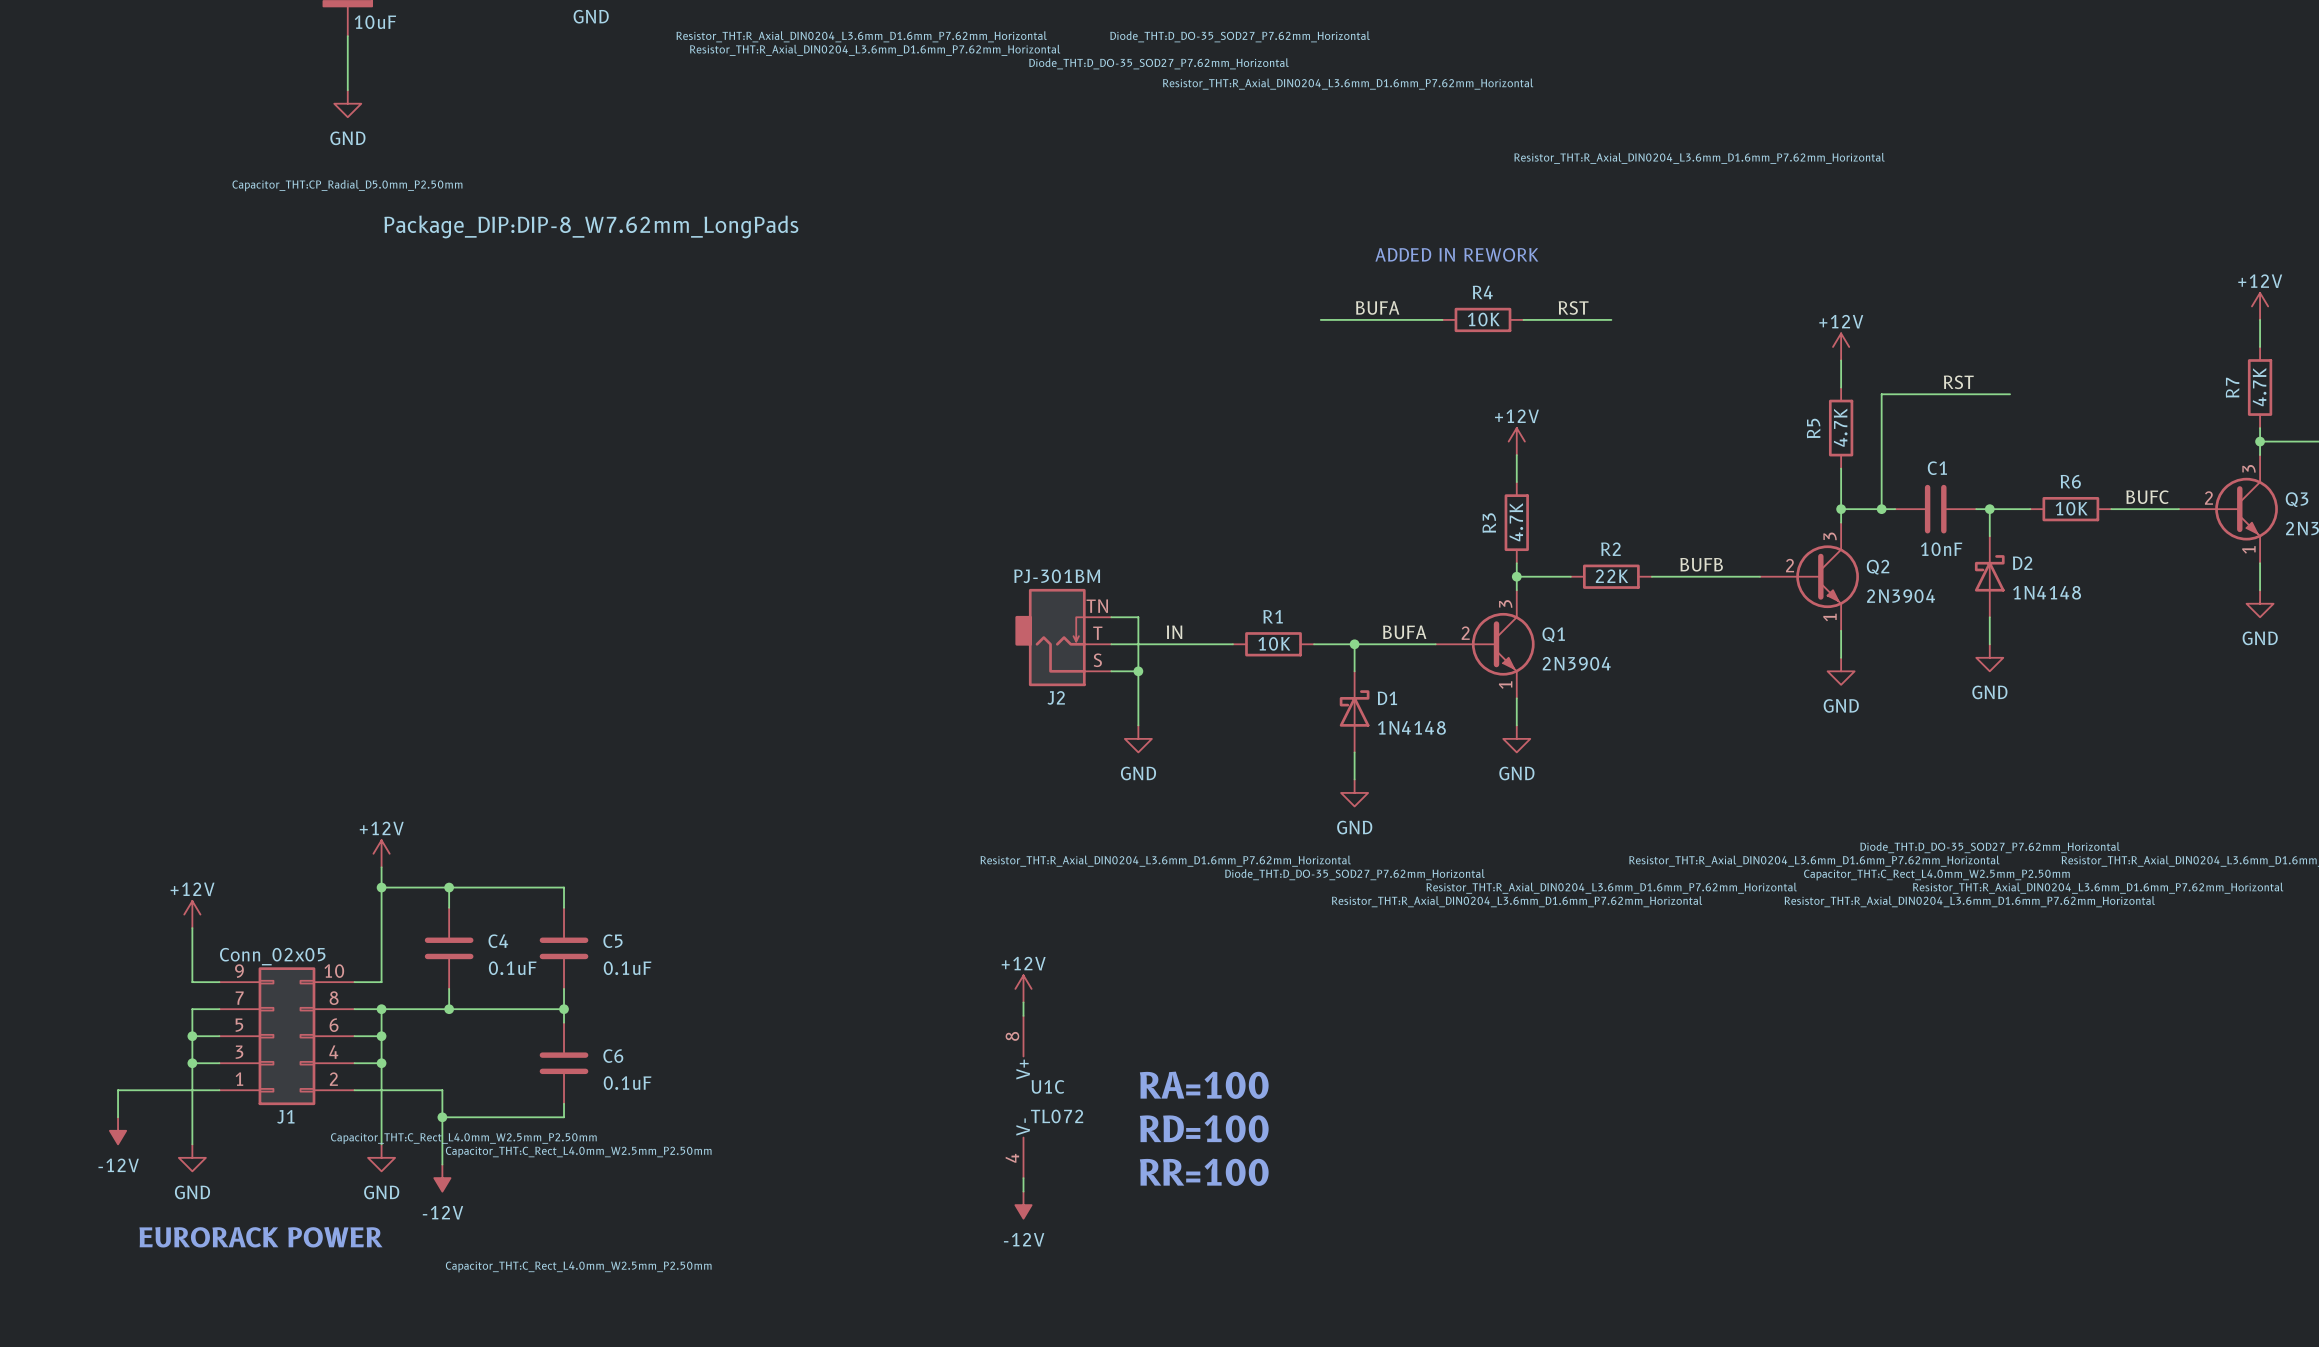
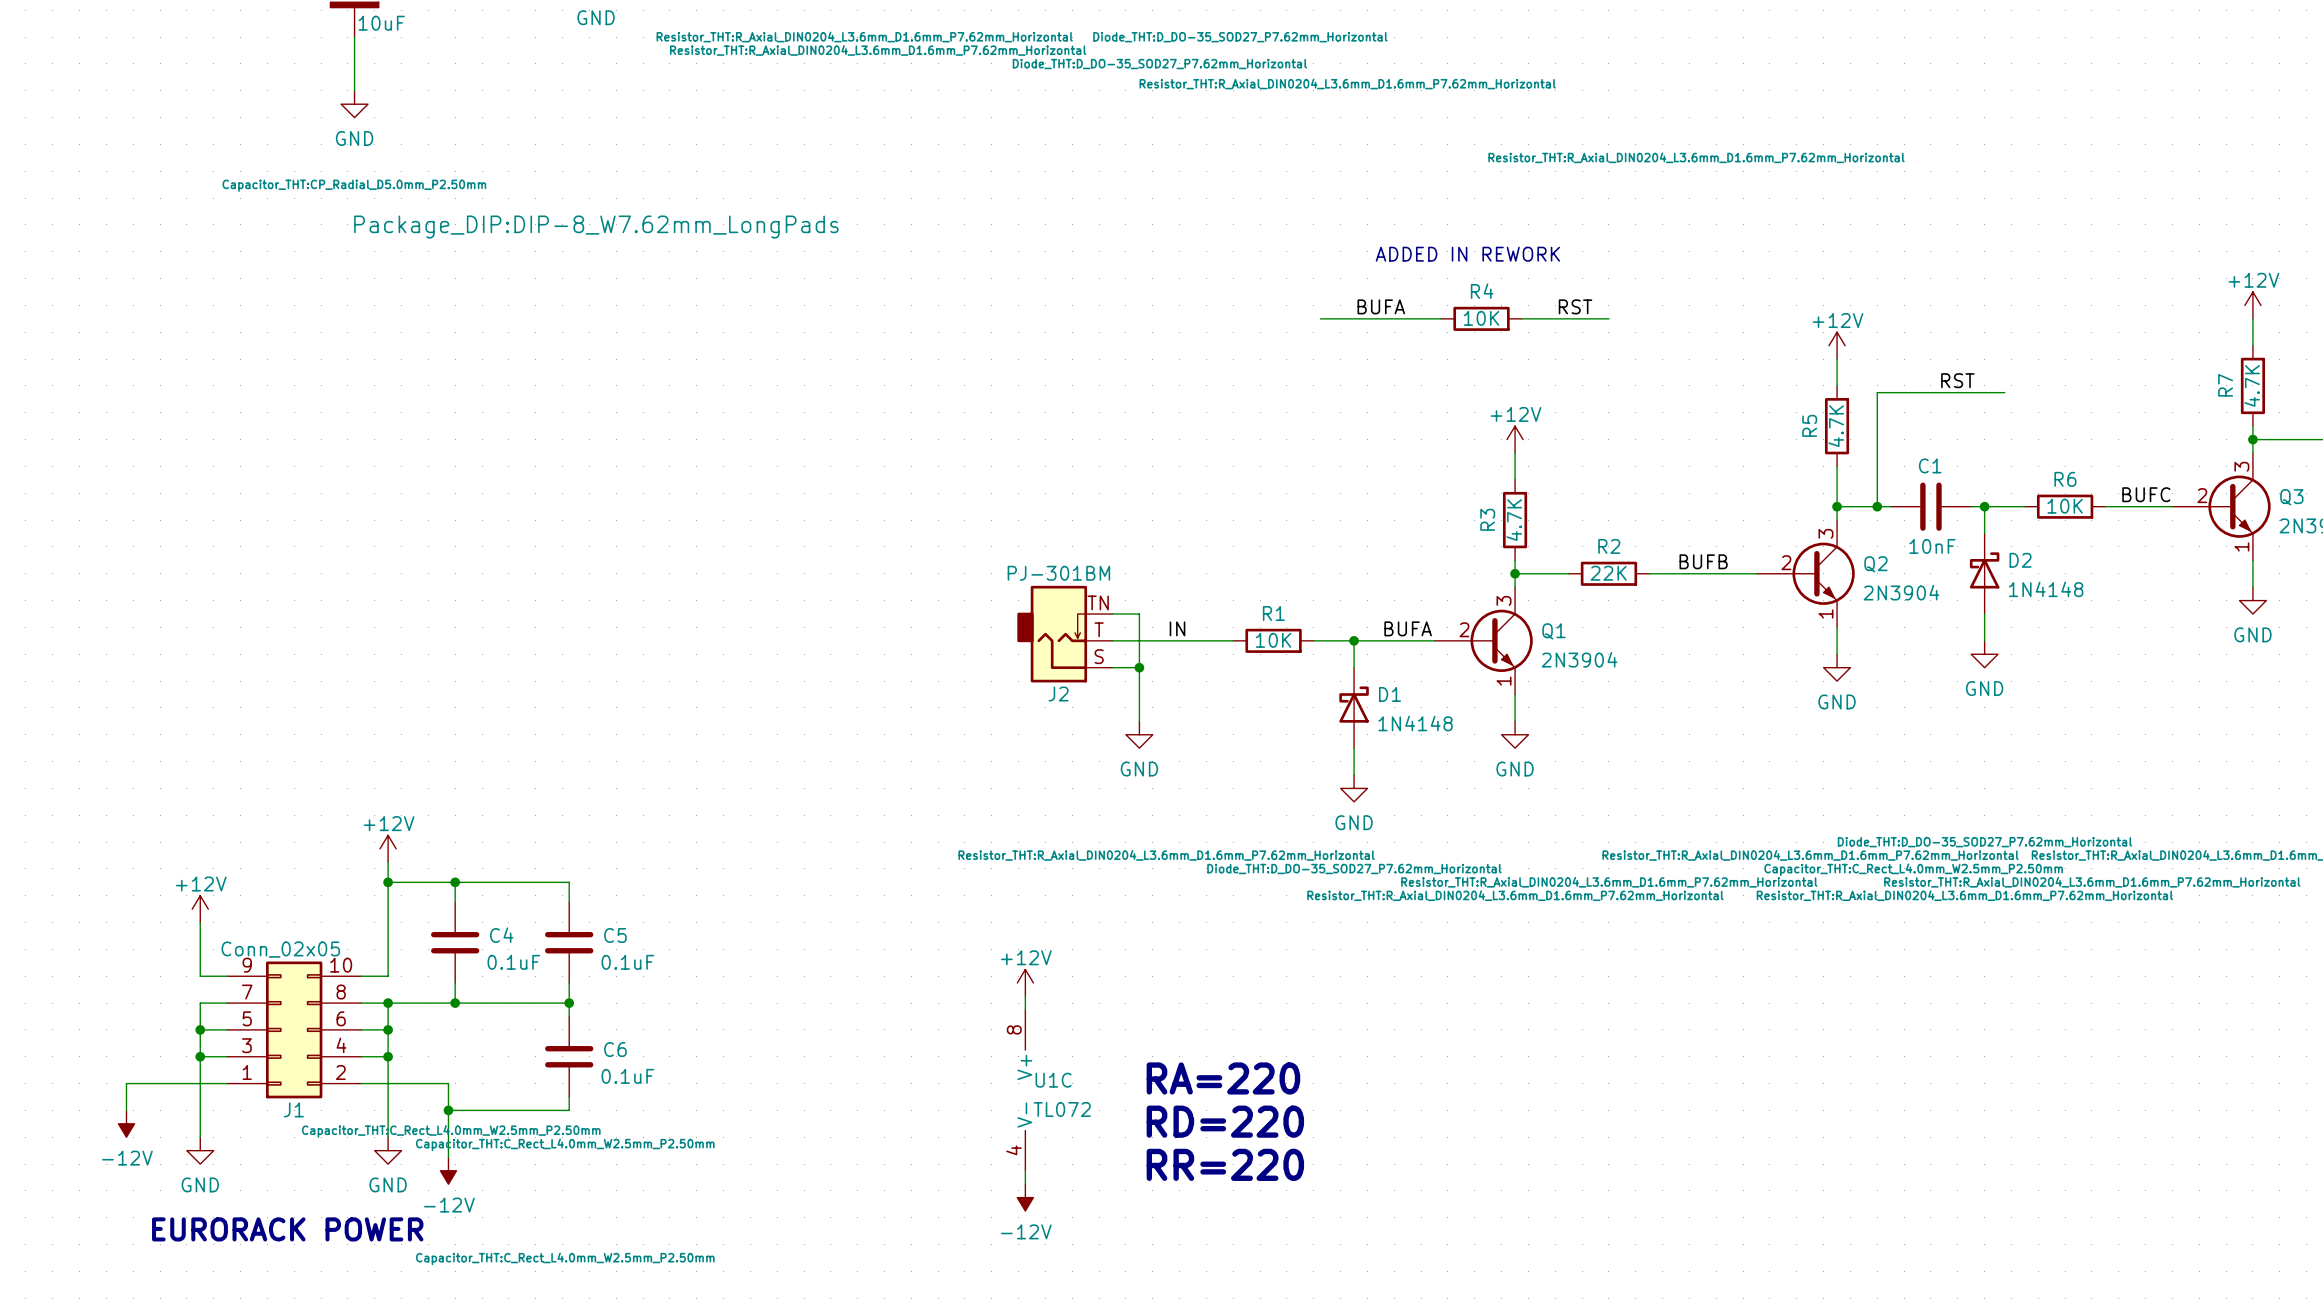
text: RA=100 (1204, 1085) -> RA=220 (1223, 1078)
text: RD=100 (1204, 1128) -> RD=220 (1225, 1121)
text: RR=100 (1204, 1172) -> RR=220 (1225, 1164)

